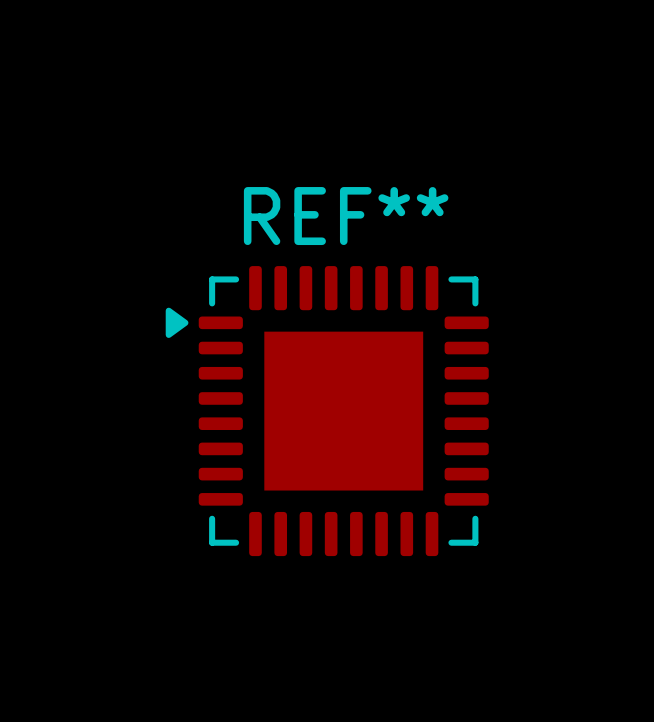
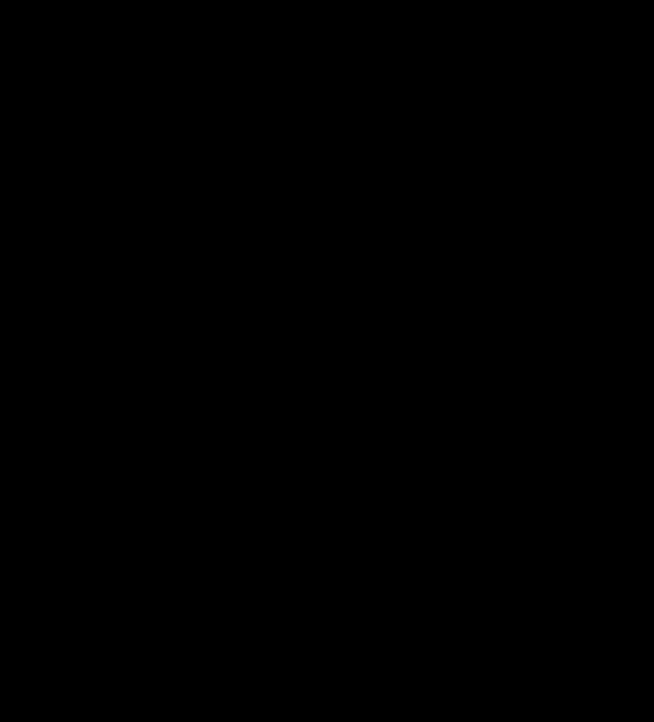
REF**: (327, 411) -> none

